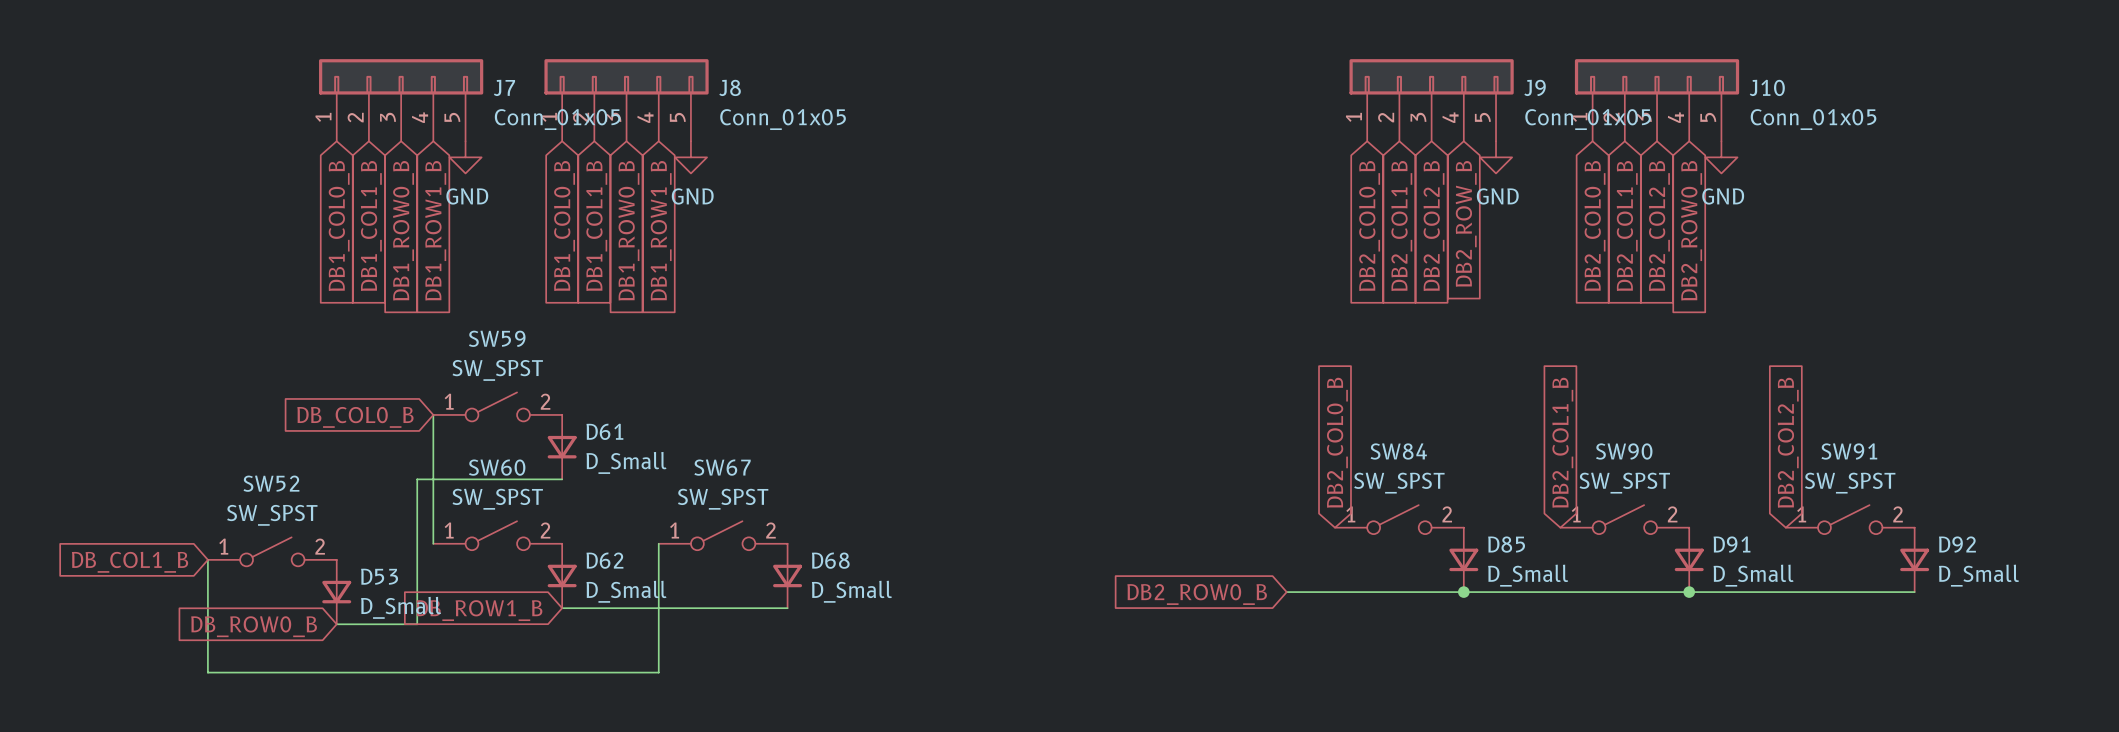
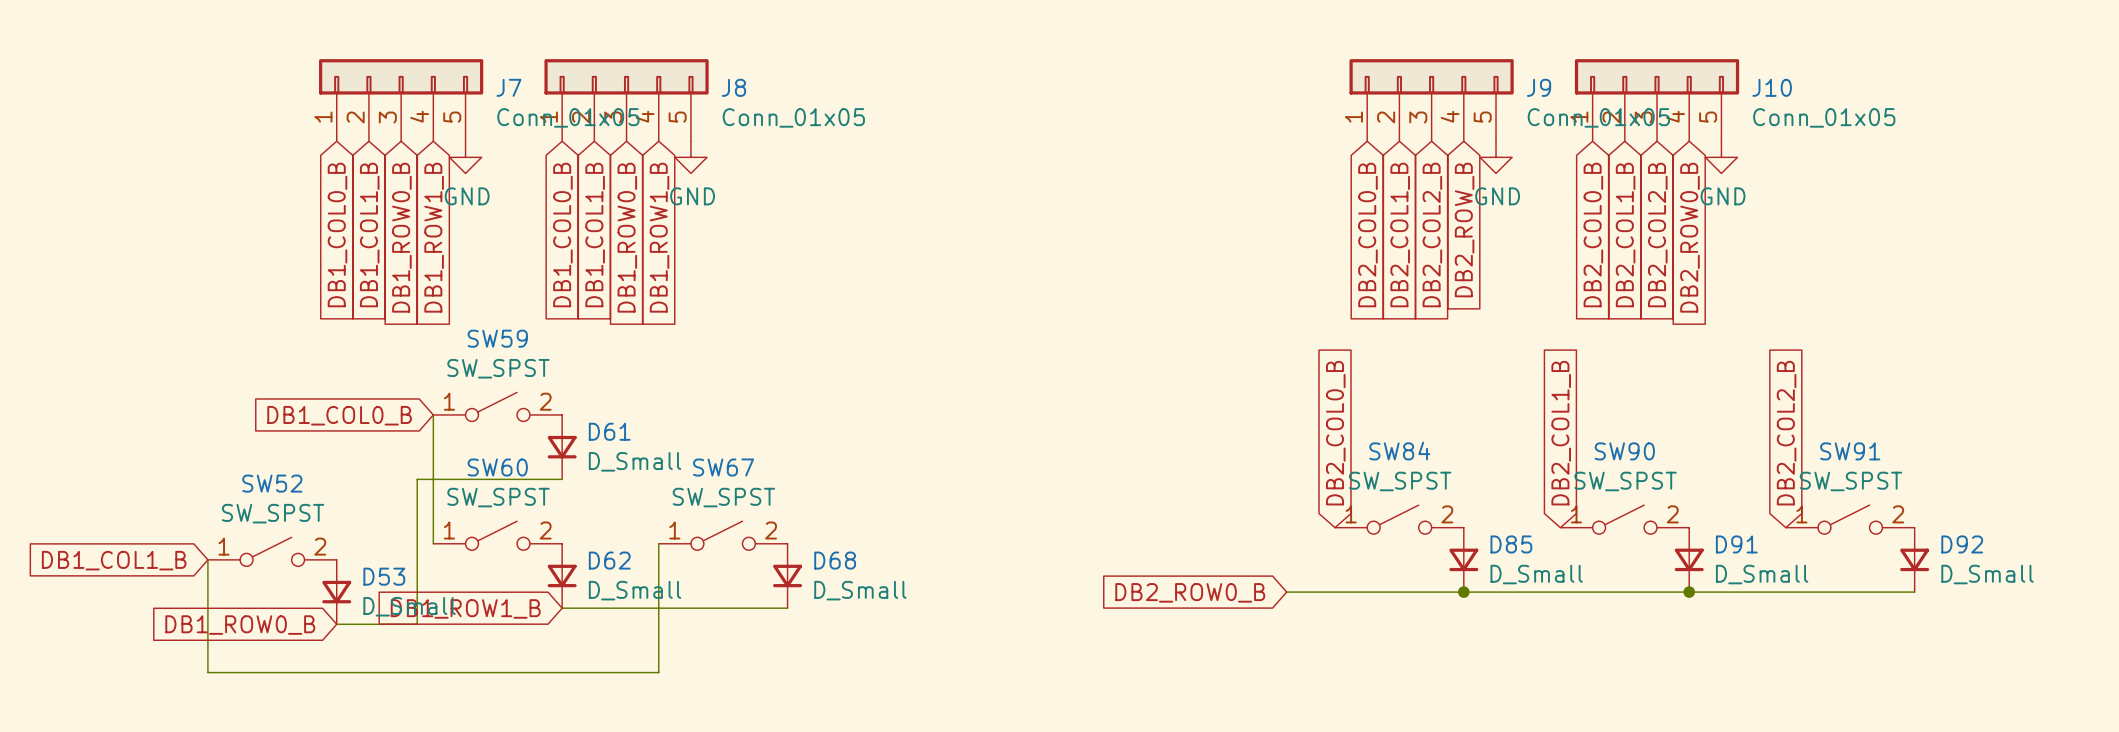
global label: DB_COL0_B (355, 417) -> DB1_COL0_B (339, 415)
global label: DB_COL1_B (130, 562) -> DB1_COL1_B (114, 560)
global label: DB_ROW1_B (479, 610) -> DB1_ROW1_B (465, 608)
global label: DB_ROW0_B (254, 626) -> DB1_ROW0_B (240, 625)

